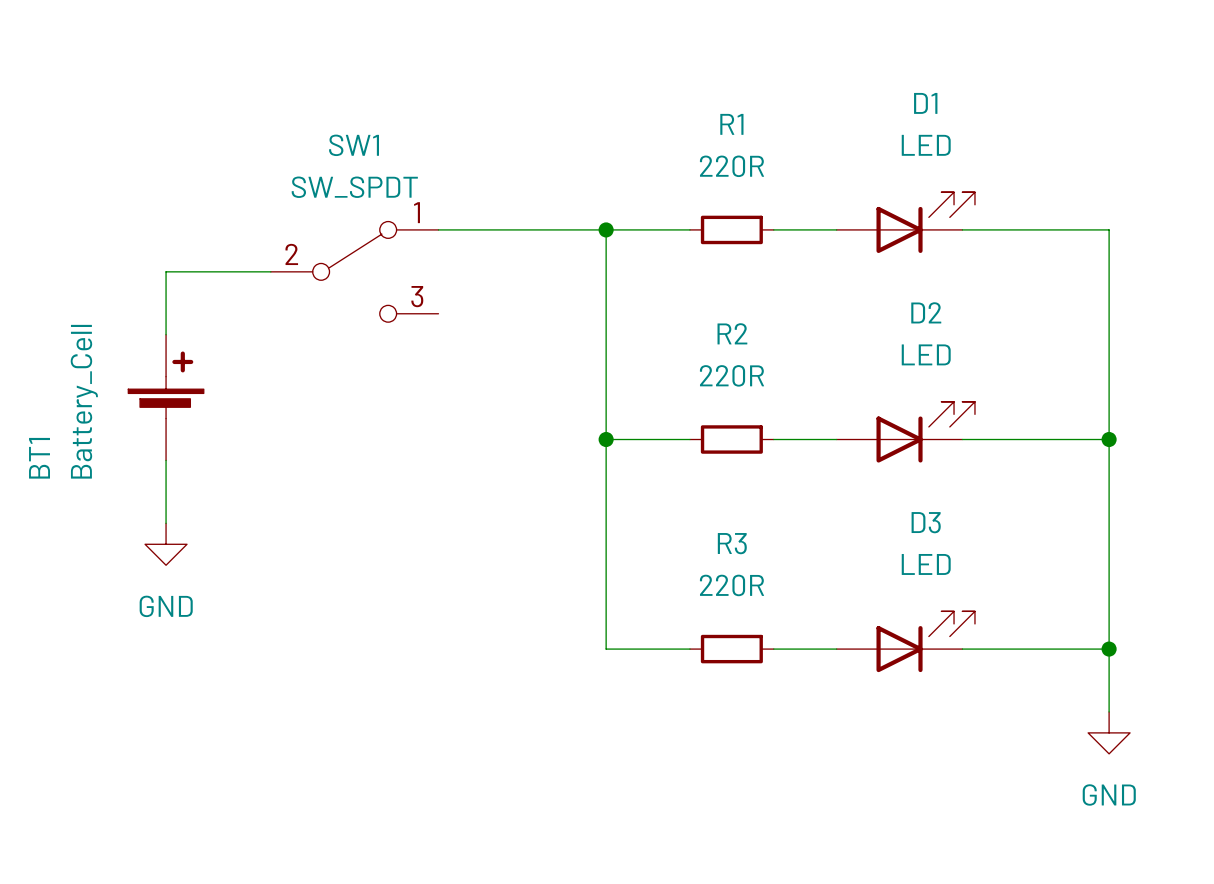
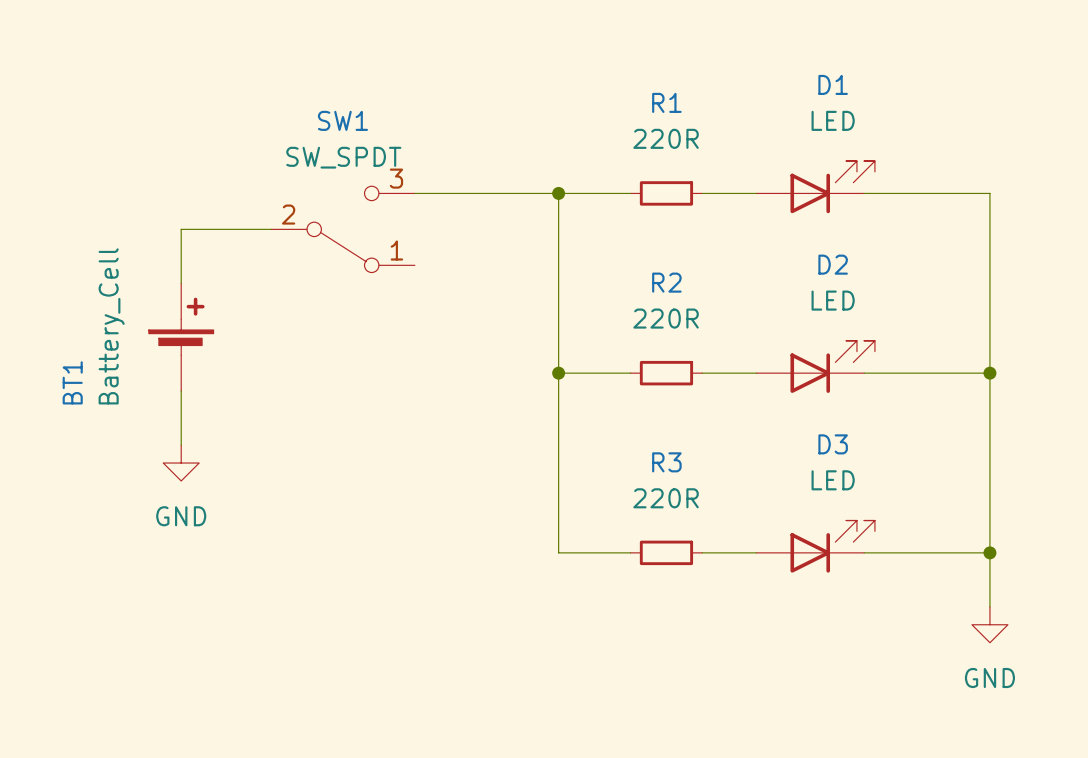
SW1 flip: as is (354, 271) -> up-down (342, 229)

